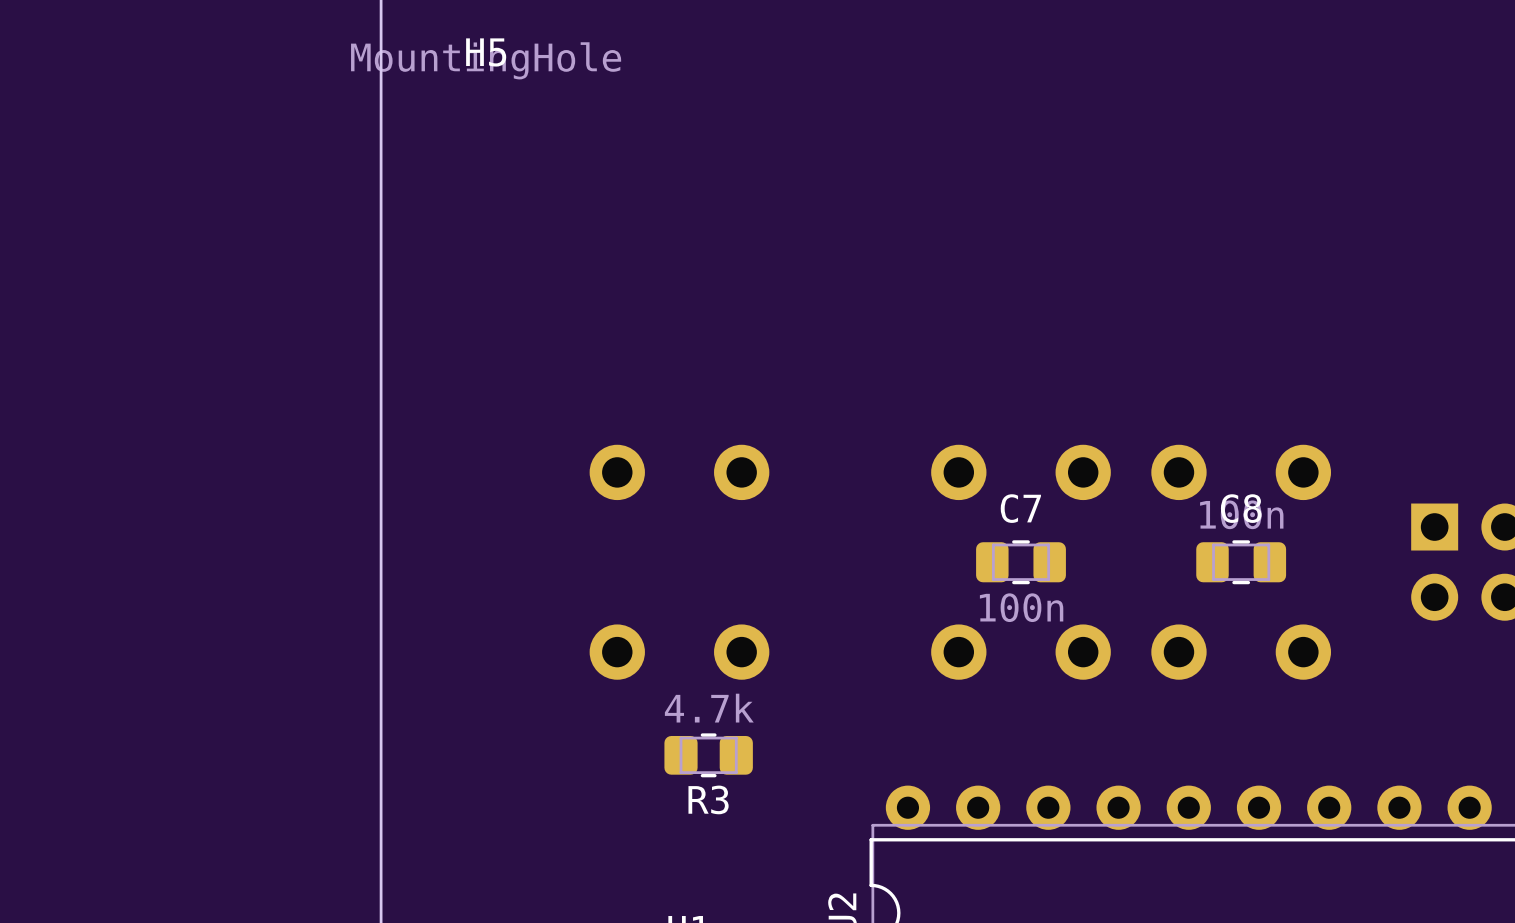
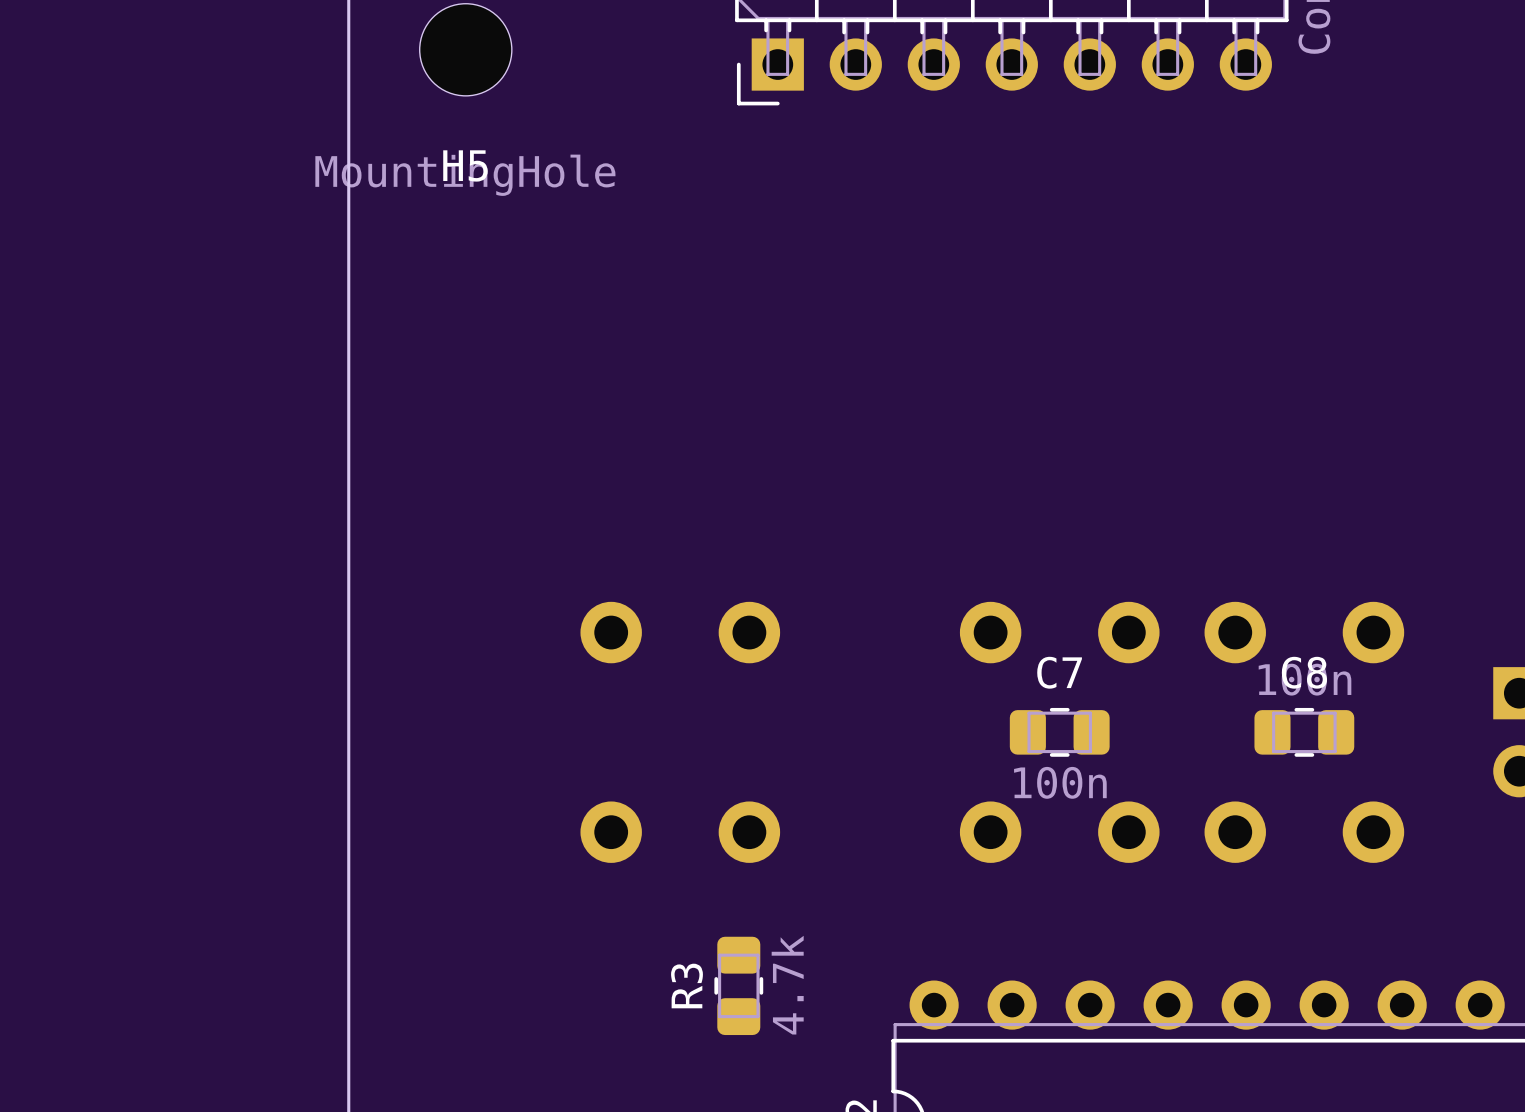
R3 rotation: 0° (708, 755) -> 90° clockwise (738, 985)

